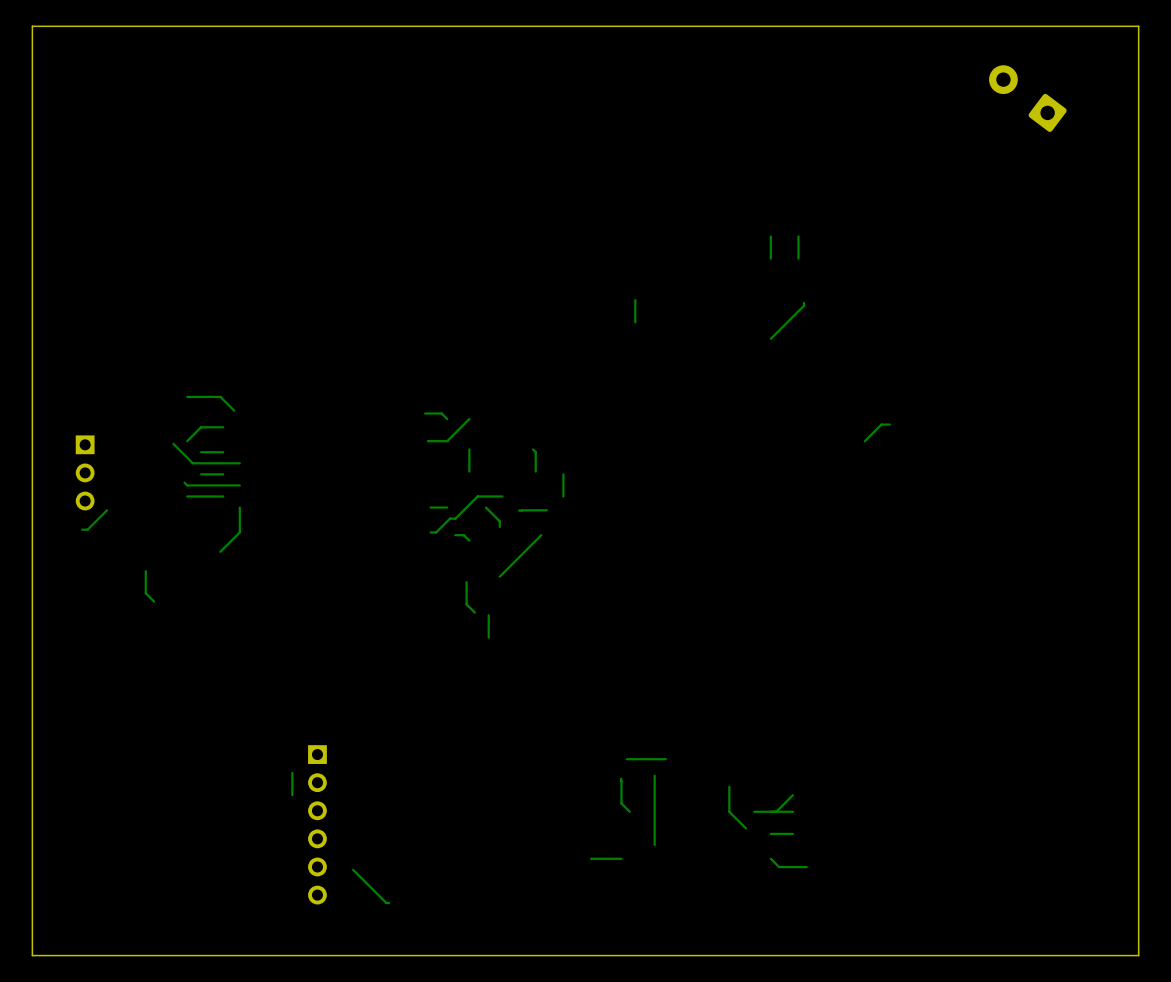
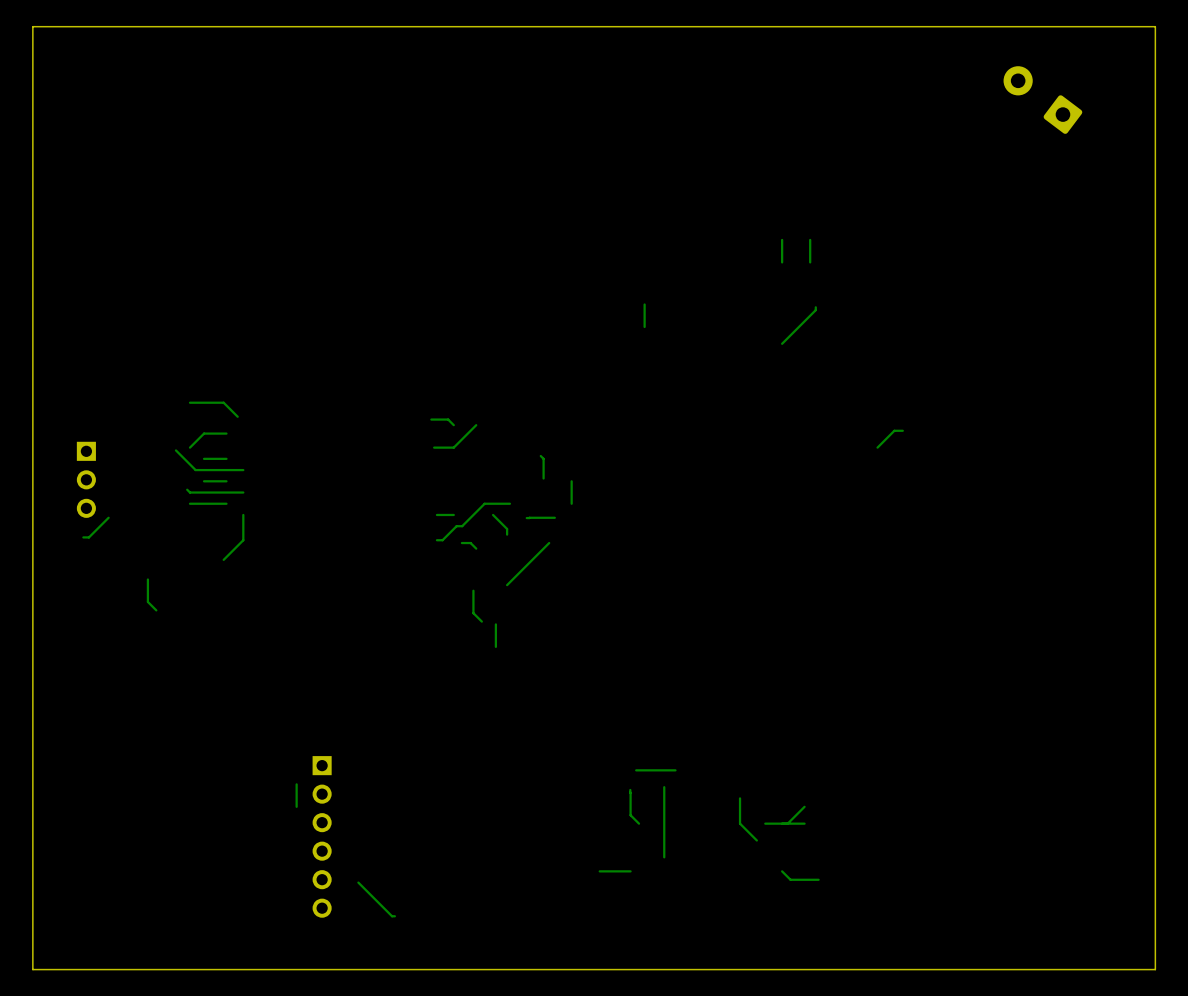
track: (469, 449) (469, 471) -> none
track: (792, 833) (770, 833) -> none

